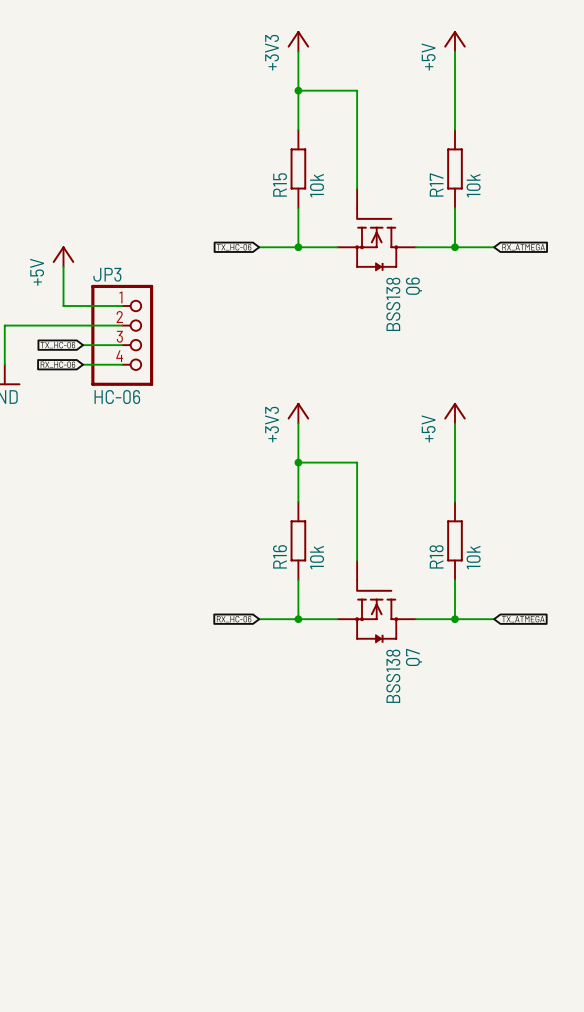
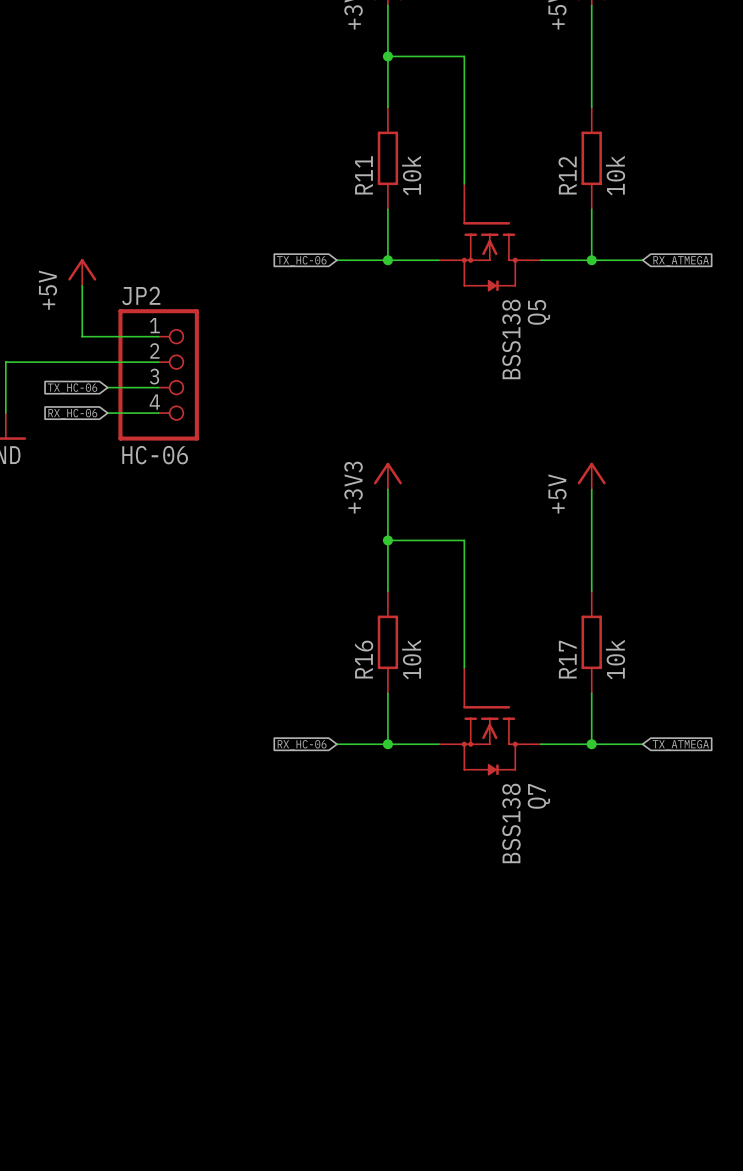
R15 name: R15 (280, 184) -> R11 (363, 175)
R17 name: R17 (436, 185) -> R12 (567, 175)
JP3 name: JP3 (107, 274) -> JP2 (141, 295)
Q6 name: Q6 (413, 286) -> Q5 (538, 312)
R18 name: R18 (436, 556) -> R17 (567, 659)

